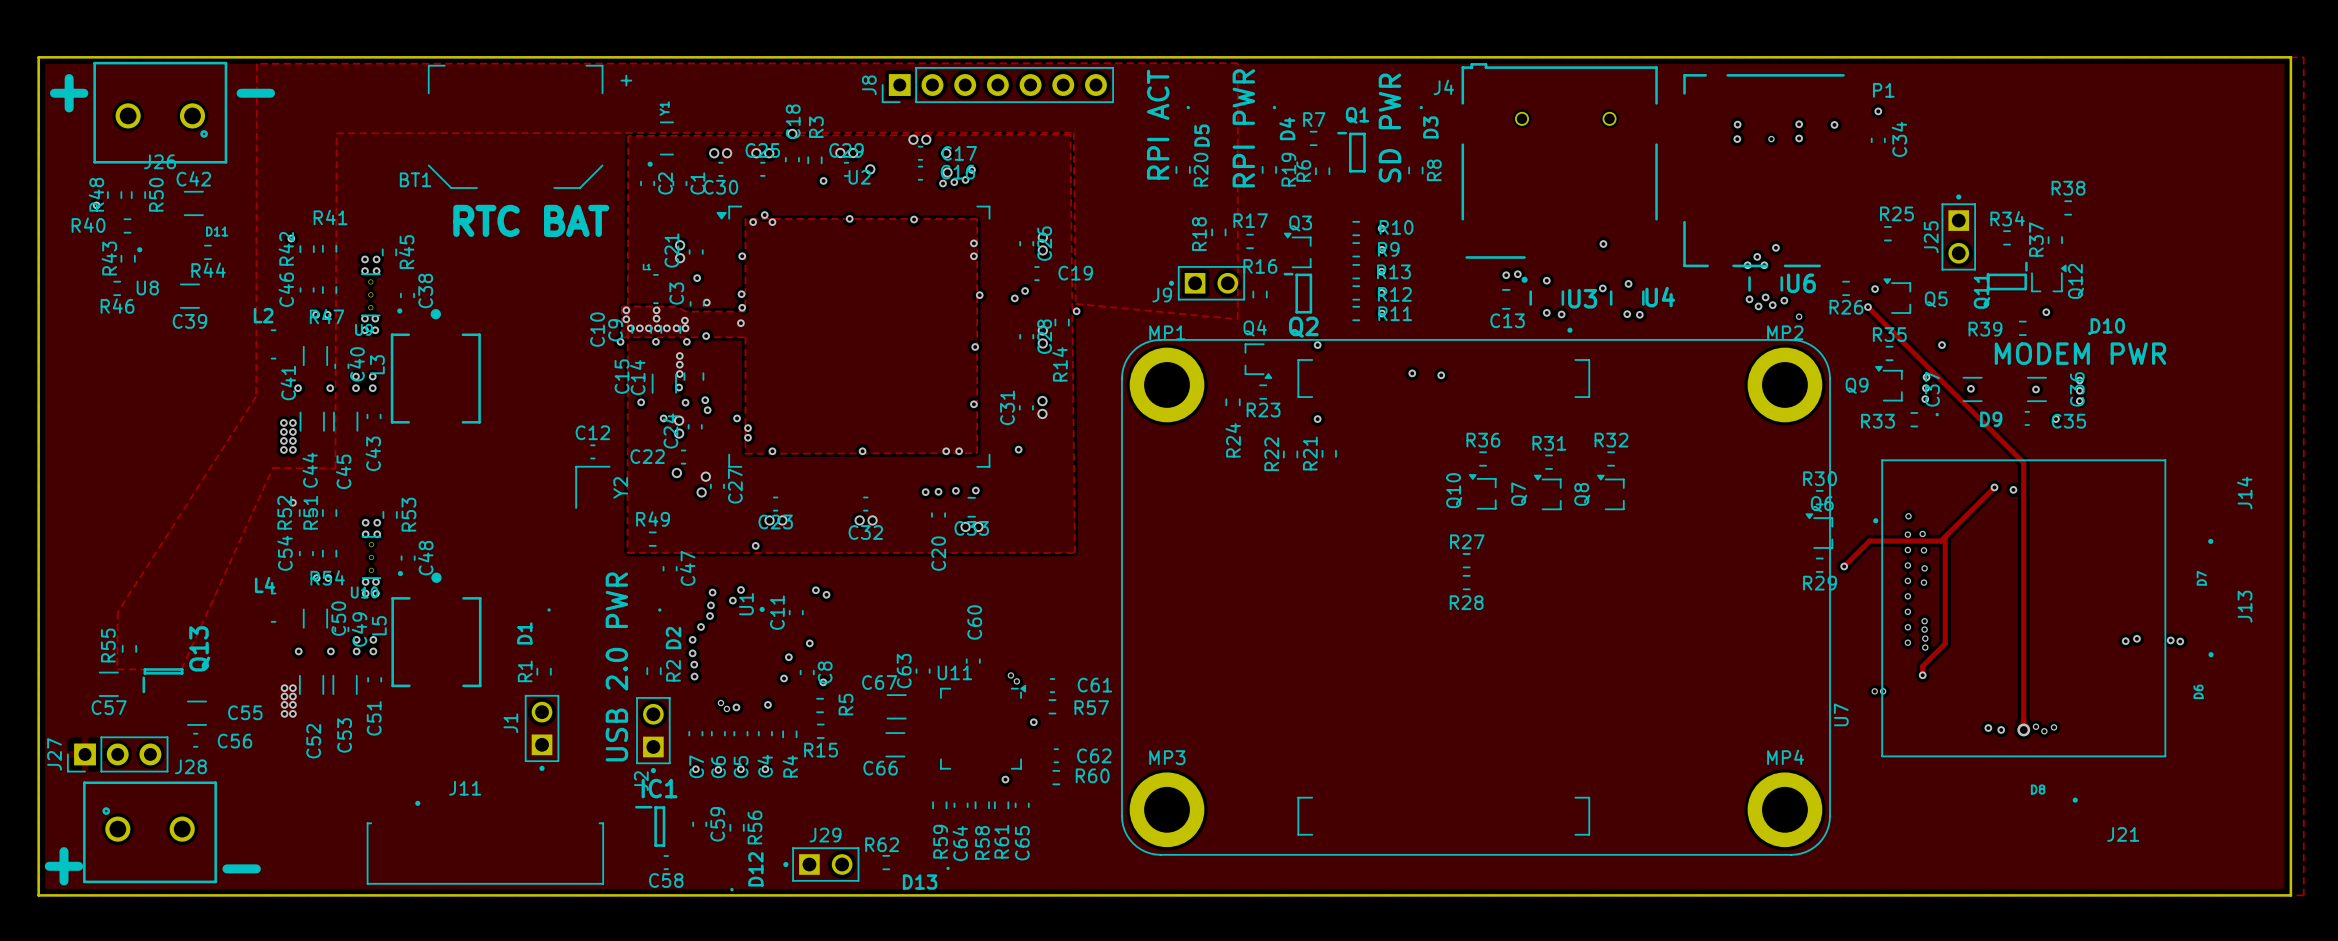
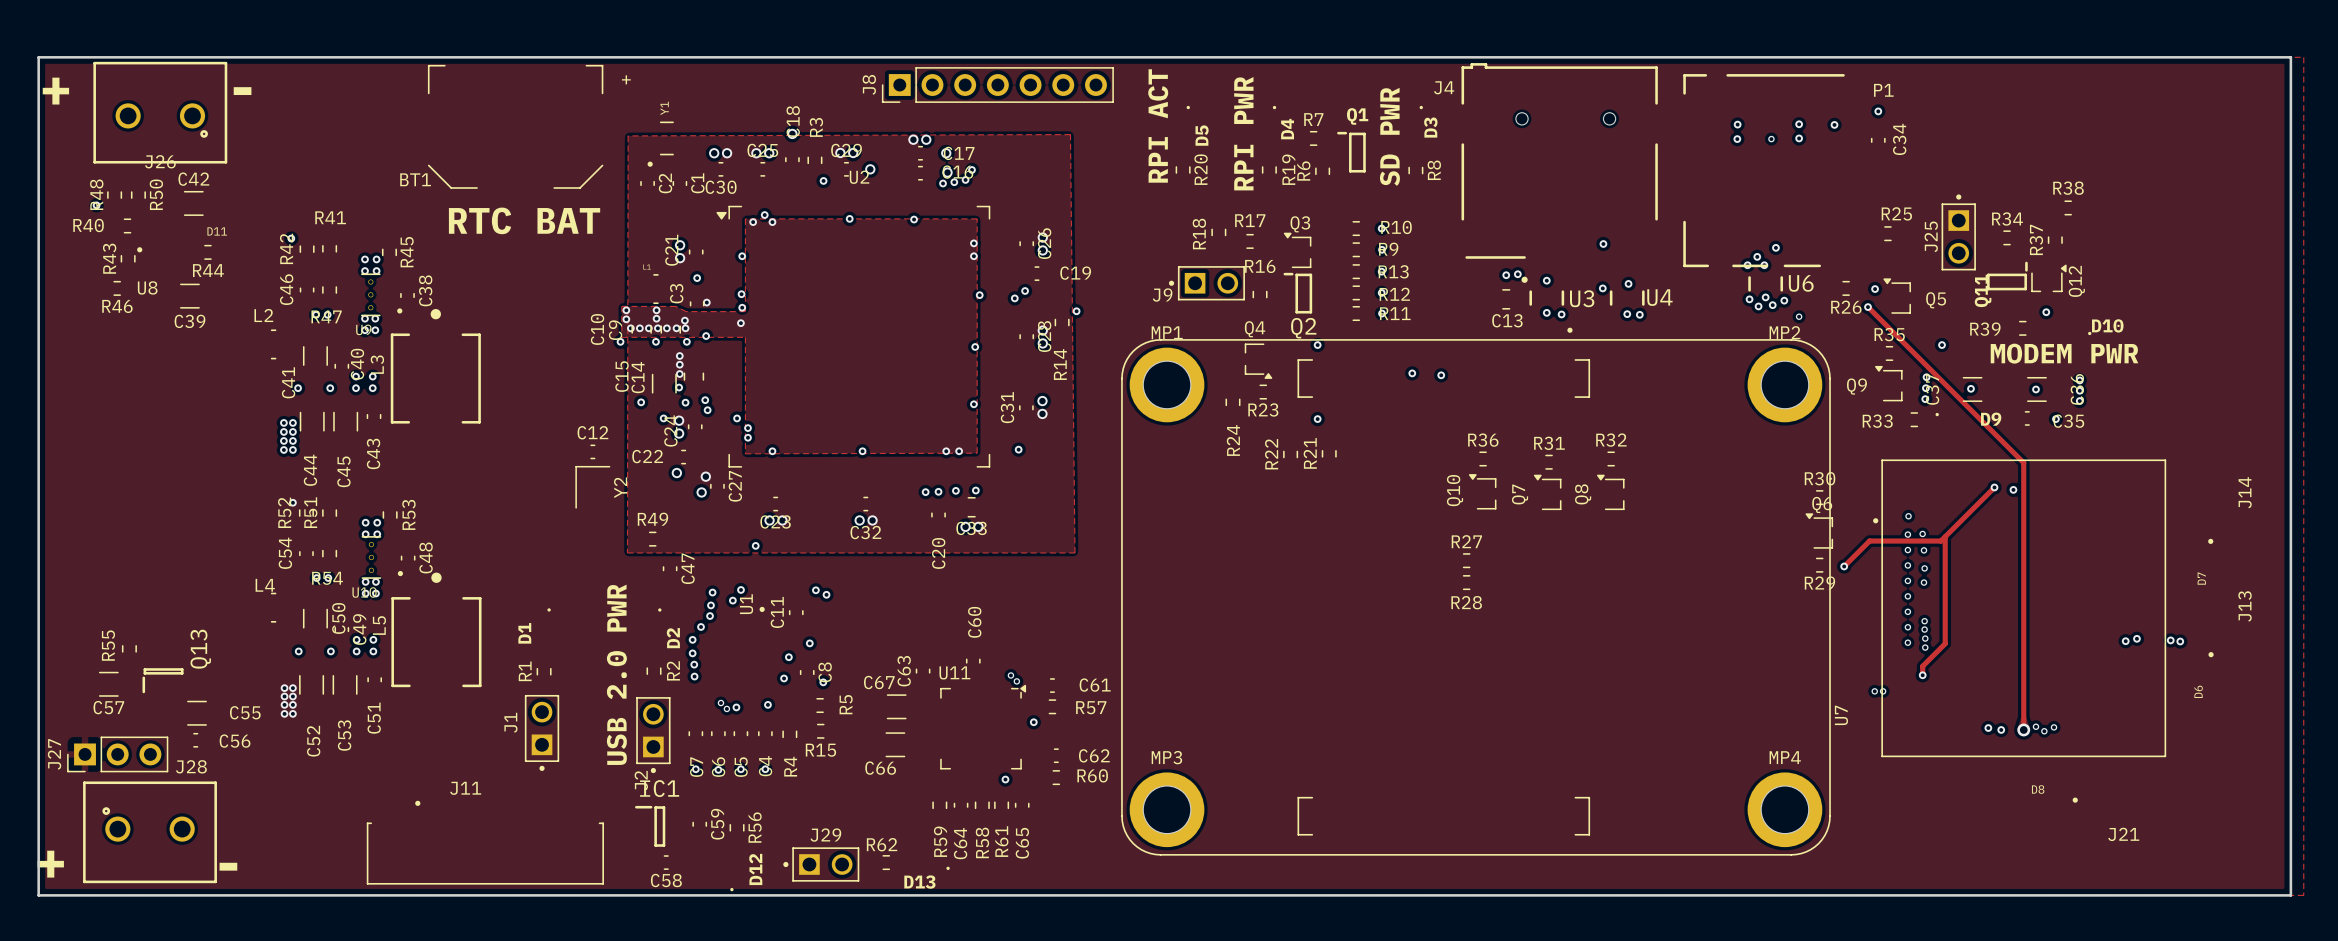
zone outline: (1237, 63) (1237, 319) (1075, 303) (1073, 132) (336, 133) (335, 468) (272, 468) (181, 669) (117, 669) (117, 612) (256, 396) (256, 63) (1237, 63) -> none

